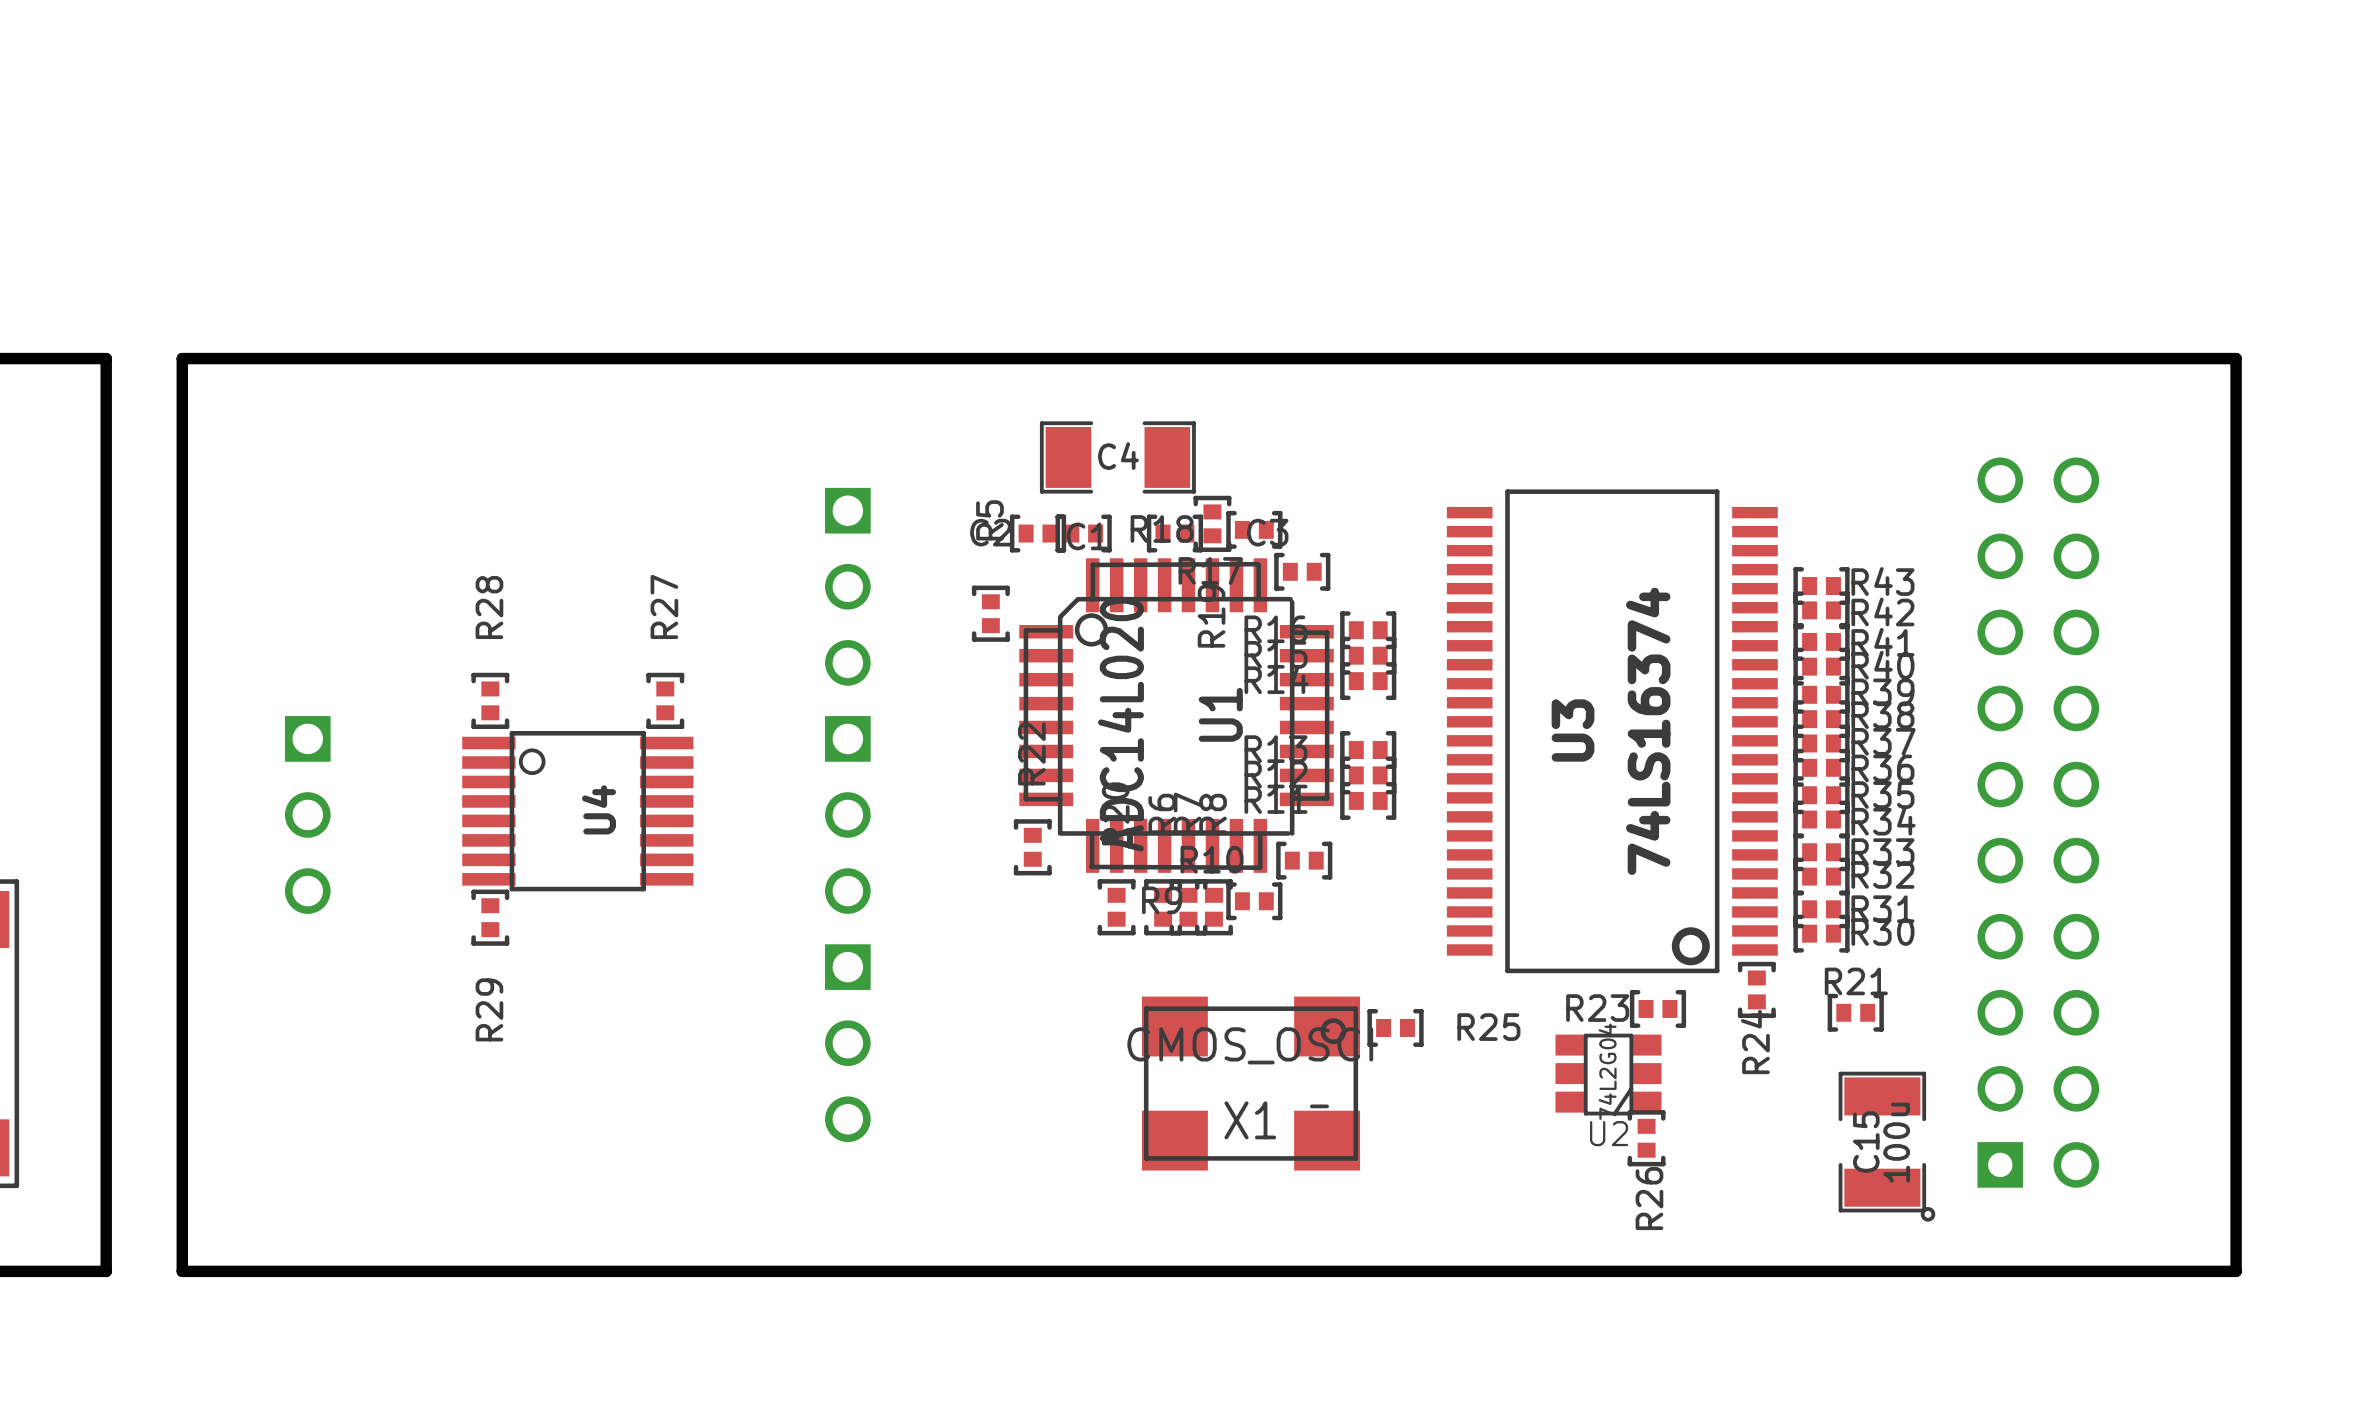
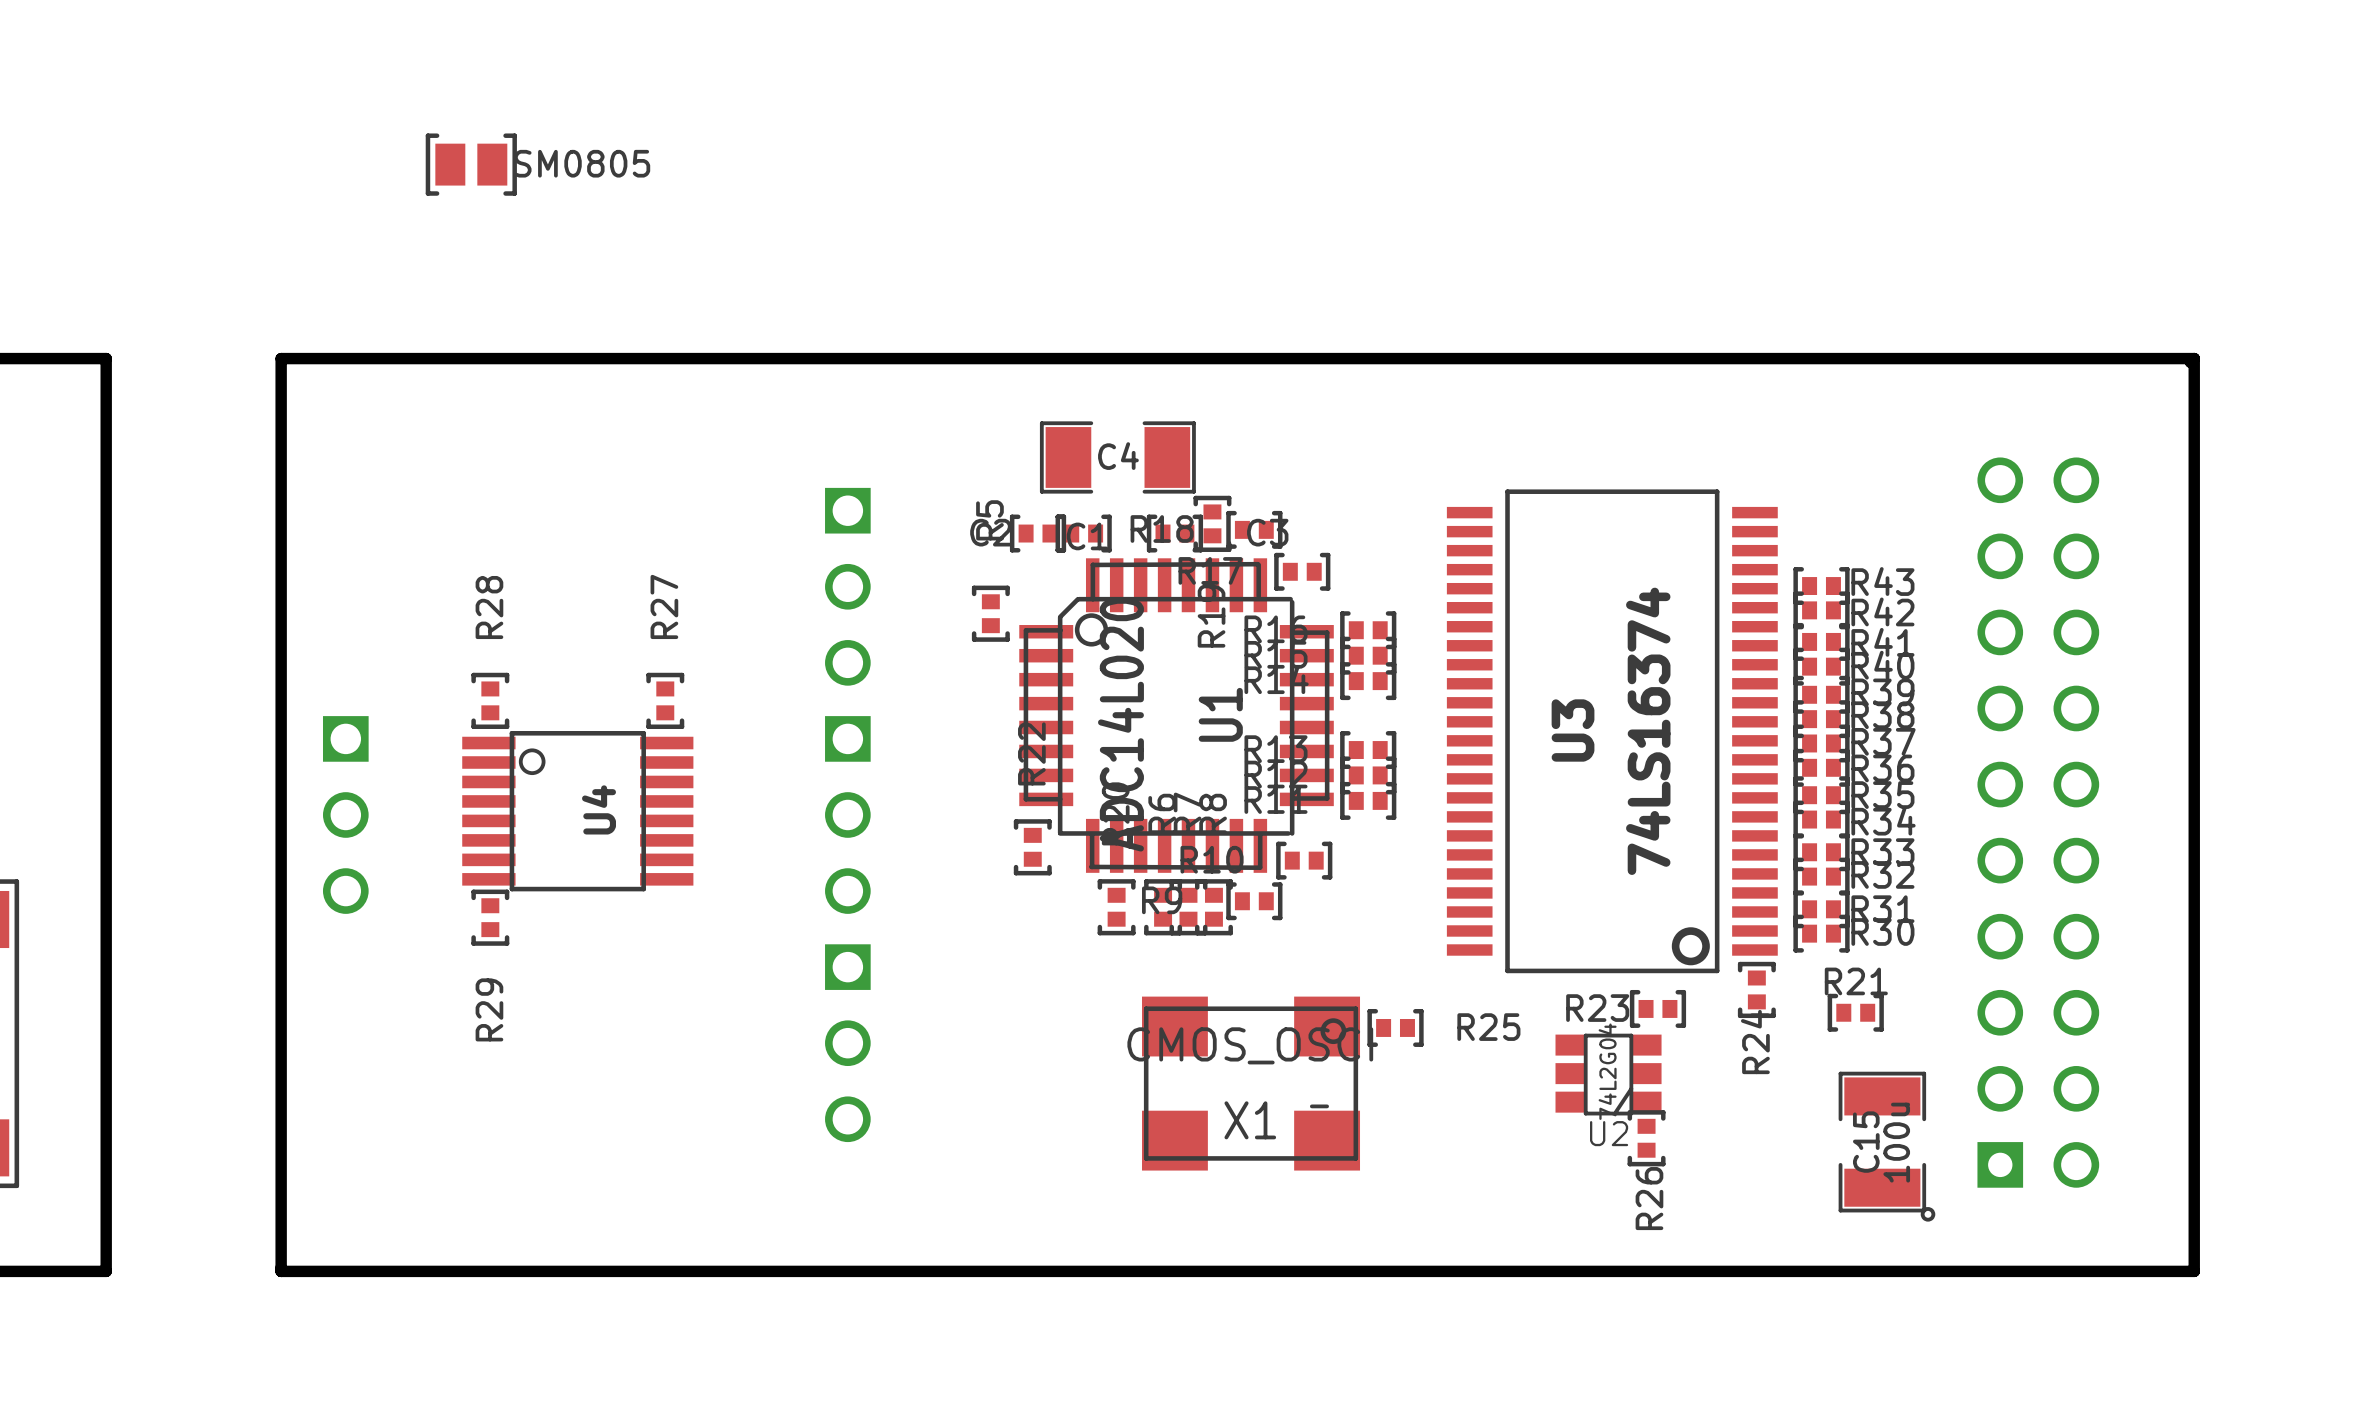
SM0805: none -> (471, 164)
board edge: (281, 358) (182, 358) (182, 1271) (281, 1271) -> (281, 358) (281, 1271)
board edge: (2194, 358) (2236, 358) (2236, 1271) (2194, 1271) -> (2190, 362) (2194, 358) (2194, 1271)
part position: (307, 814) -> (345, 814)

